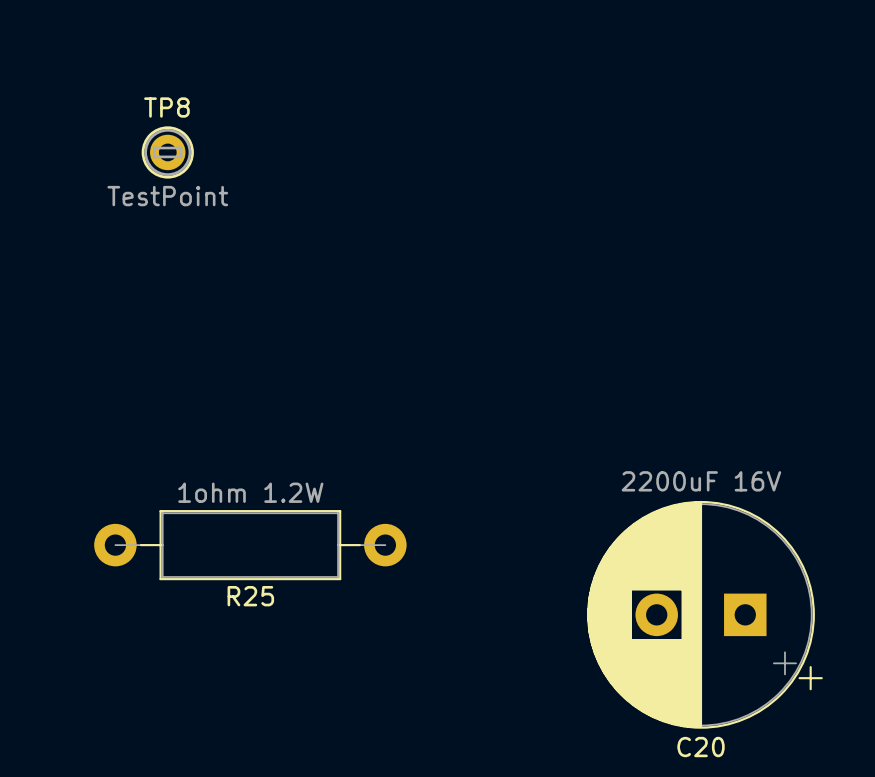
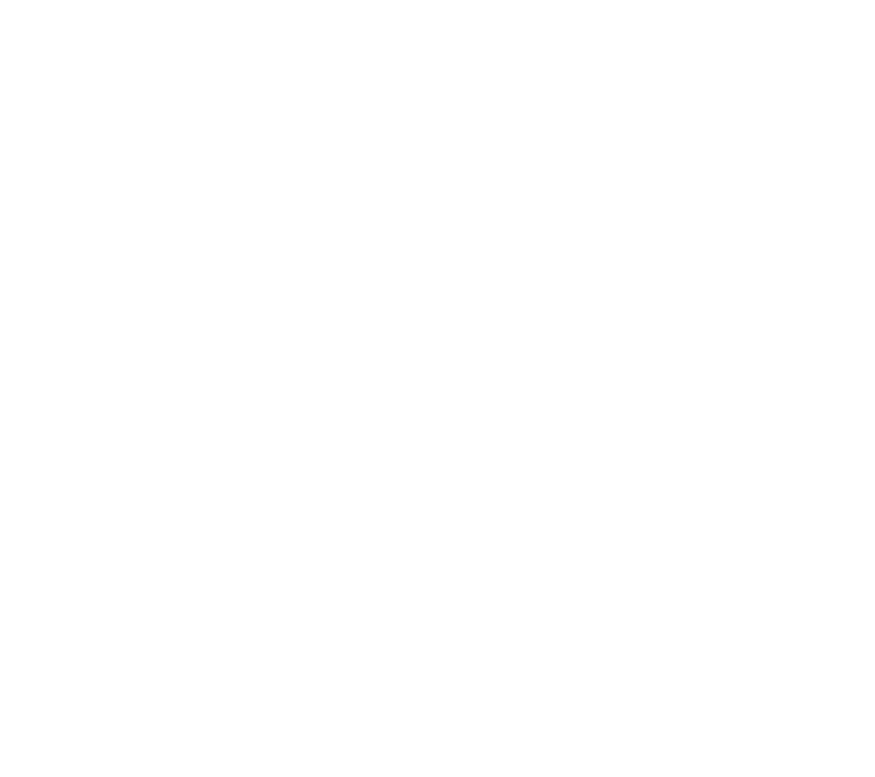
TP8: TestPoint (167, 152) -> none
R25: 1ohm 1.2W (250, 545) -> none
C20: 2200uF 16V (704, 614) -> none

